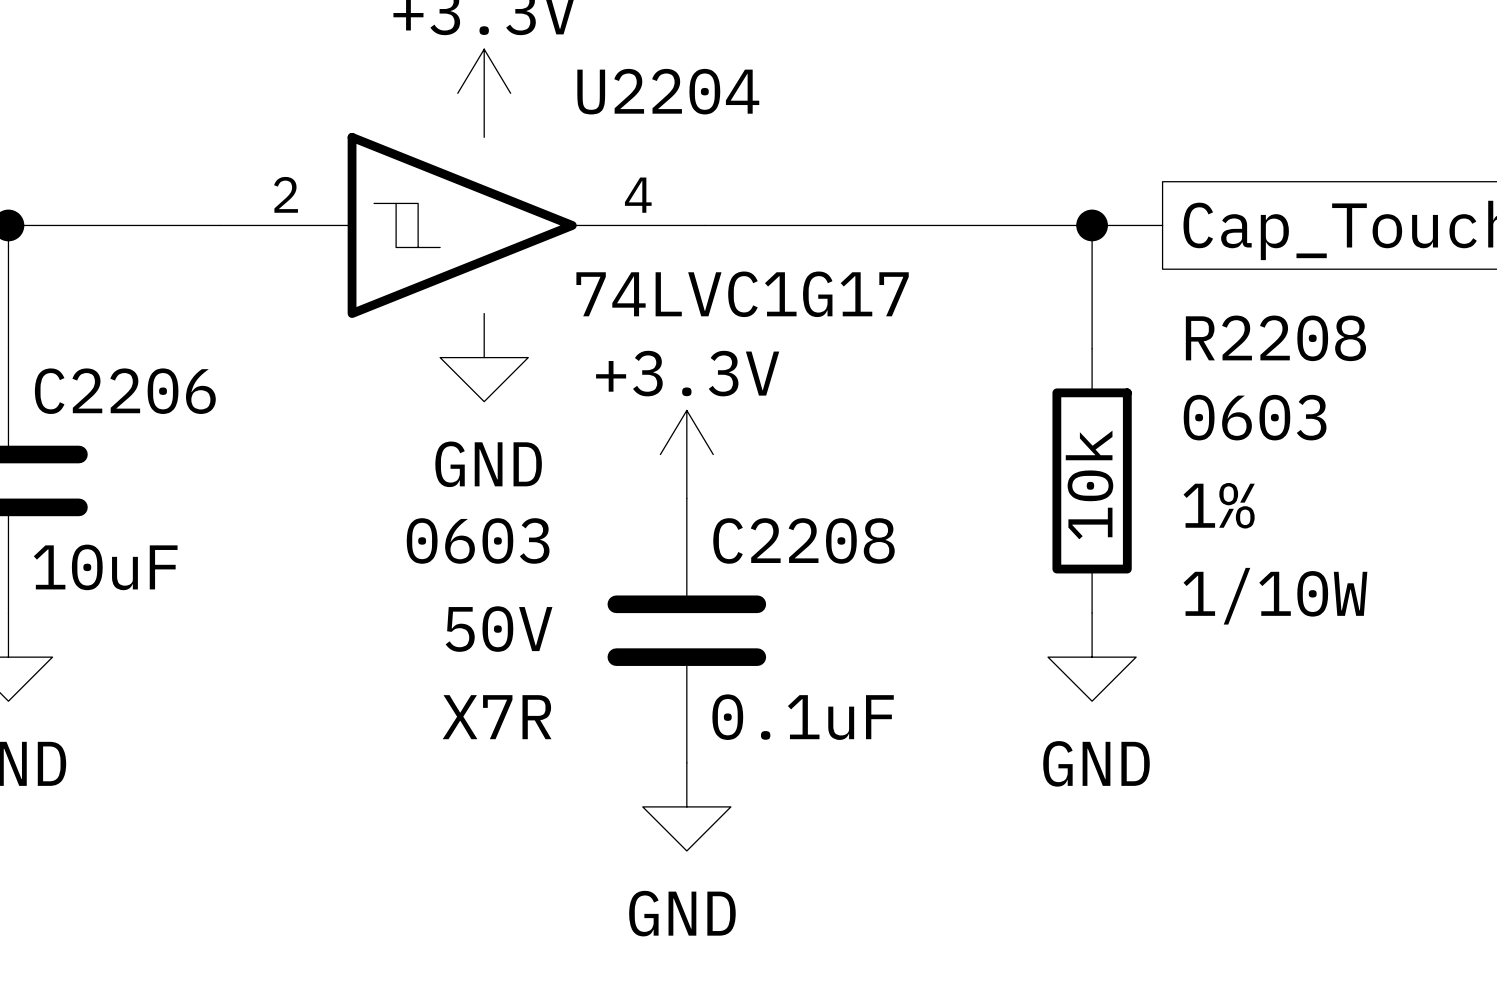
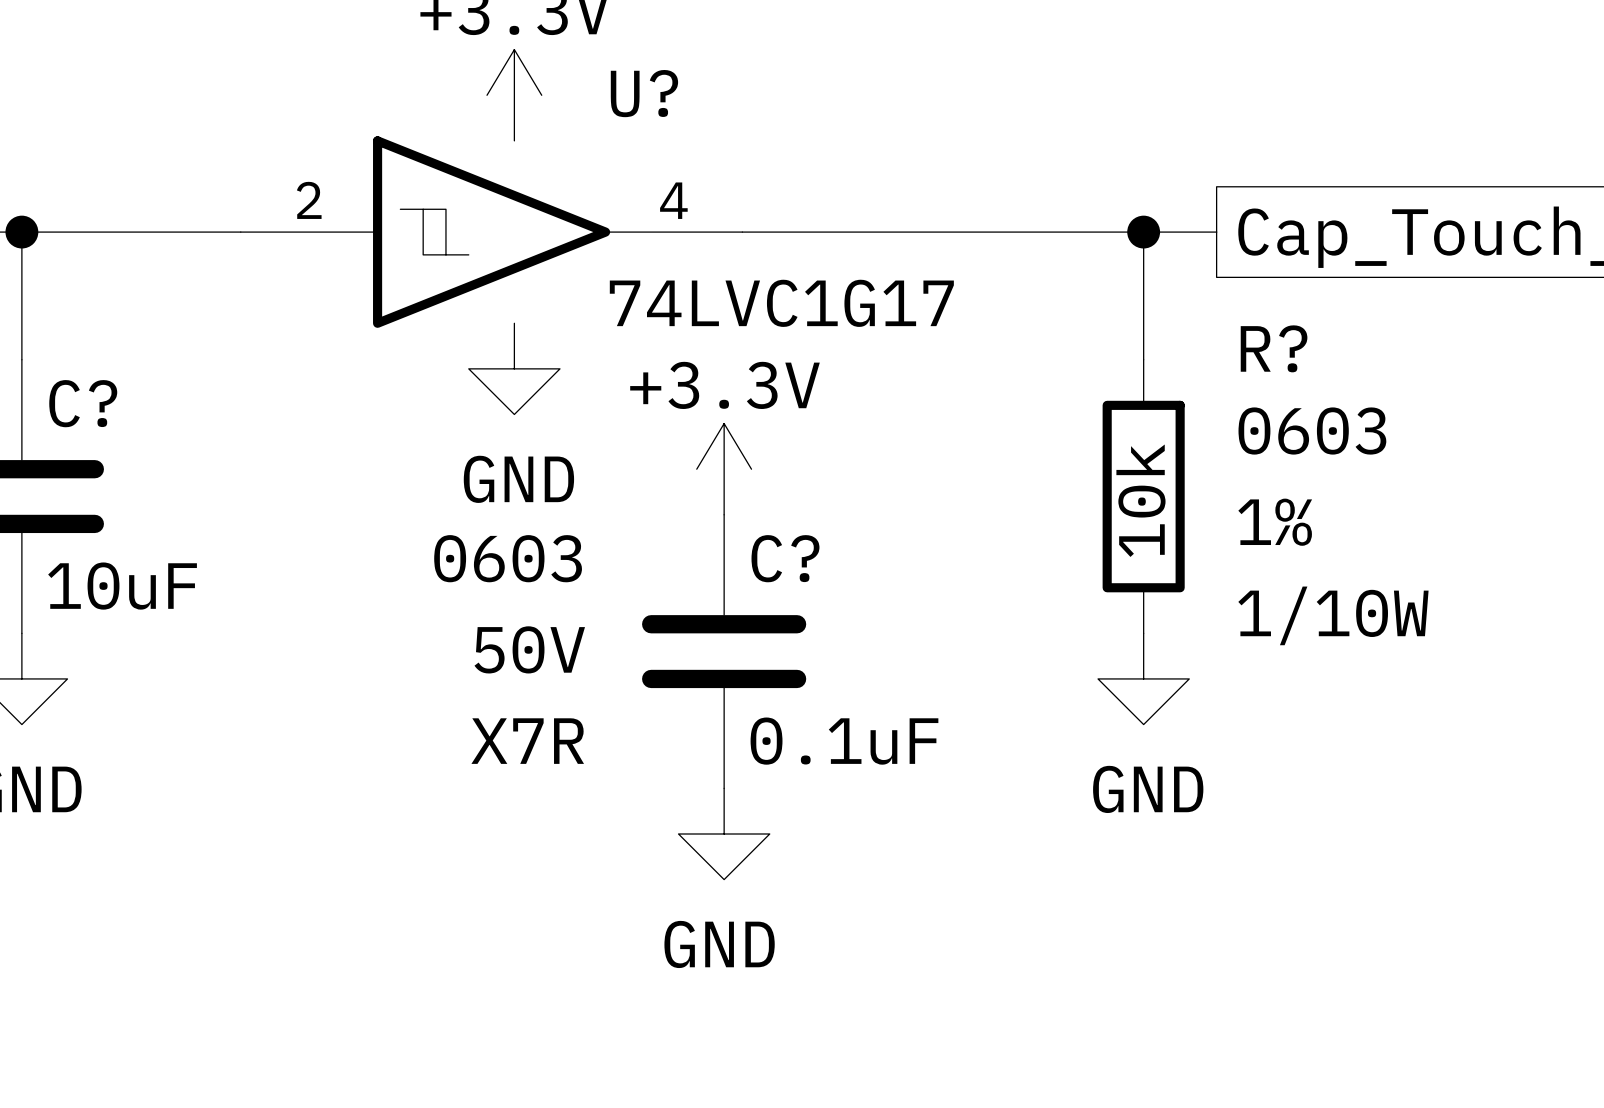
U2204 name: U2204 (668, 91) -> U? (644, 93)
R2208 name: R2208 (1275, 338) -> R? (1274, 348)
C2206 name: C2206 (125, 391) -> C? (83, 403)
C2208 name: C2208 (803, 540) -> C? (785, 558)

